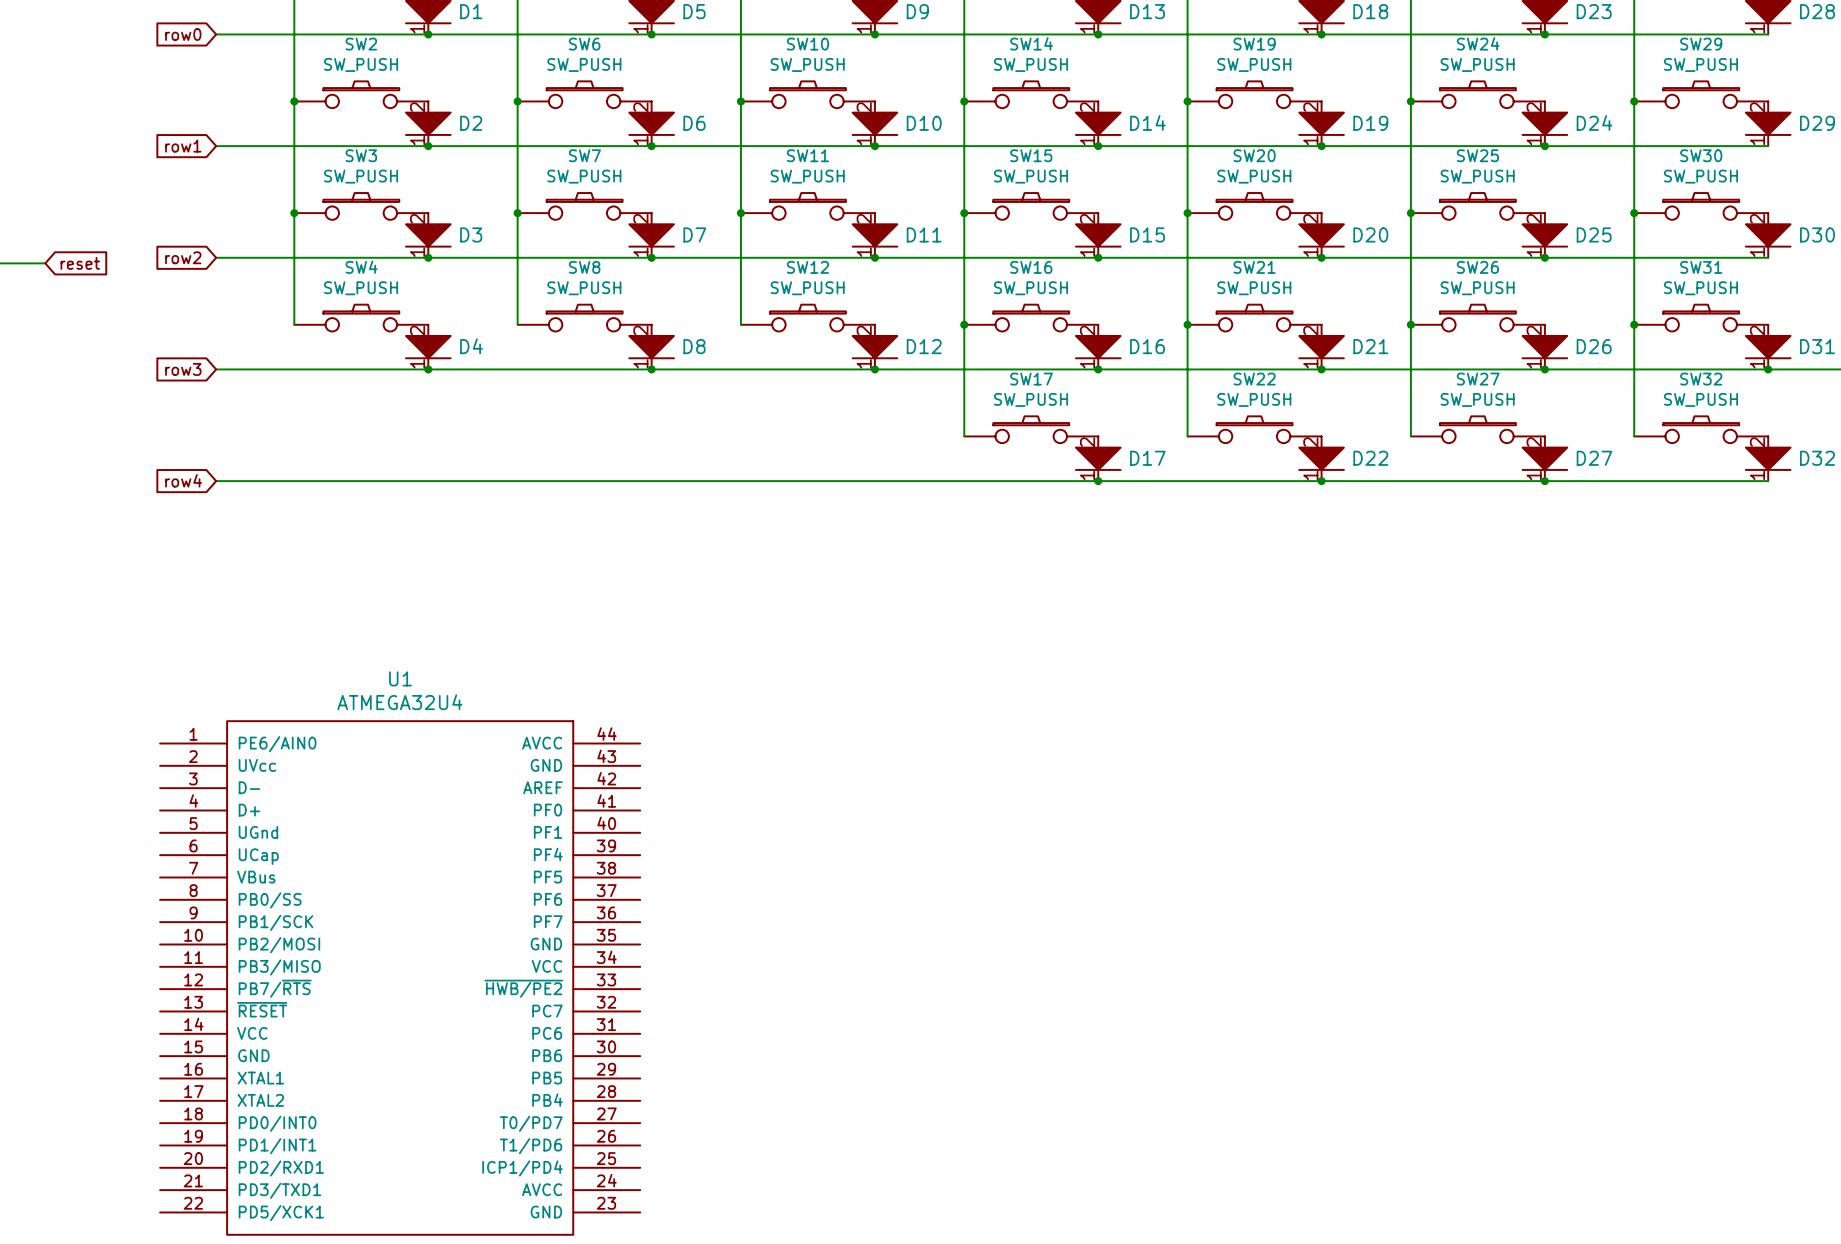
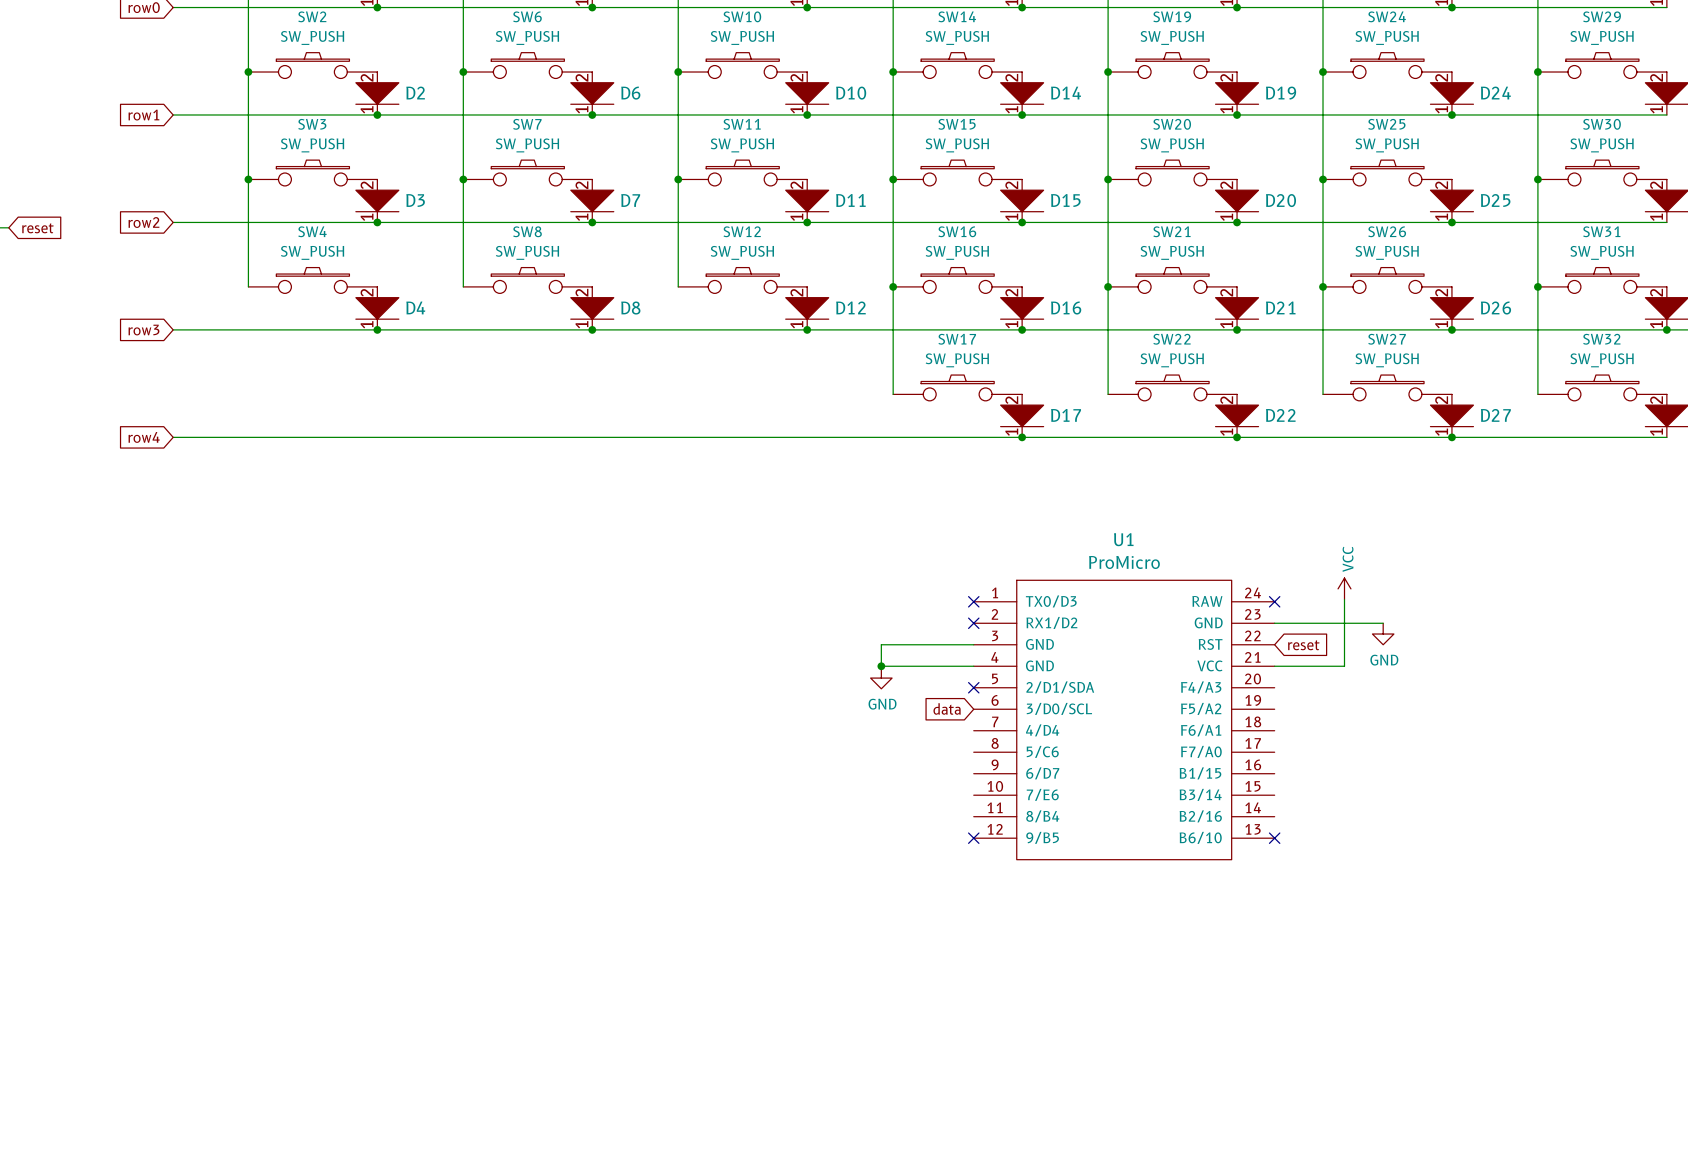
power symbol: none -> VCC (1344, 588)
wire: none -> (1344, 599) (1344, 666) (1274, 666)
no-connect mark: none -> (973, 601)
no-connect mark: none -> (1274, 601)
no-connect mark: none -> (973, 623)
wire: none -> (1274, 623) (1383, 623)
U1 name position: U1 (400, 678) -> U1 (1123, 539)
power symbol: none -> GND (1383, 634)
wire: none -> (973, 644) (881, 644) (881, 667)
global label: none -> reset (1303, 645)
U1 value: ATMEGA32U4 (399, 702) -> ProMicro (1124, 562)
wire: none -> (881, 666) (973, 666)
junction: none -> (881, 666)
U1 symbol: [160, 721, 641, 1235] -> [973, 580, 1275, 860]
power symbol: none -> GND (881, 678)
no-connect mark: none -> (973, 687)
global label: none -> data (947, 708)
no-connect mark: none -> (973, 838)
no-connect mark: none -> (1274, 838)

